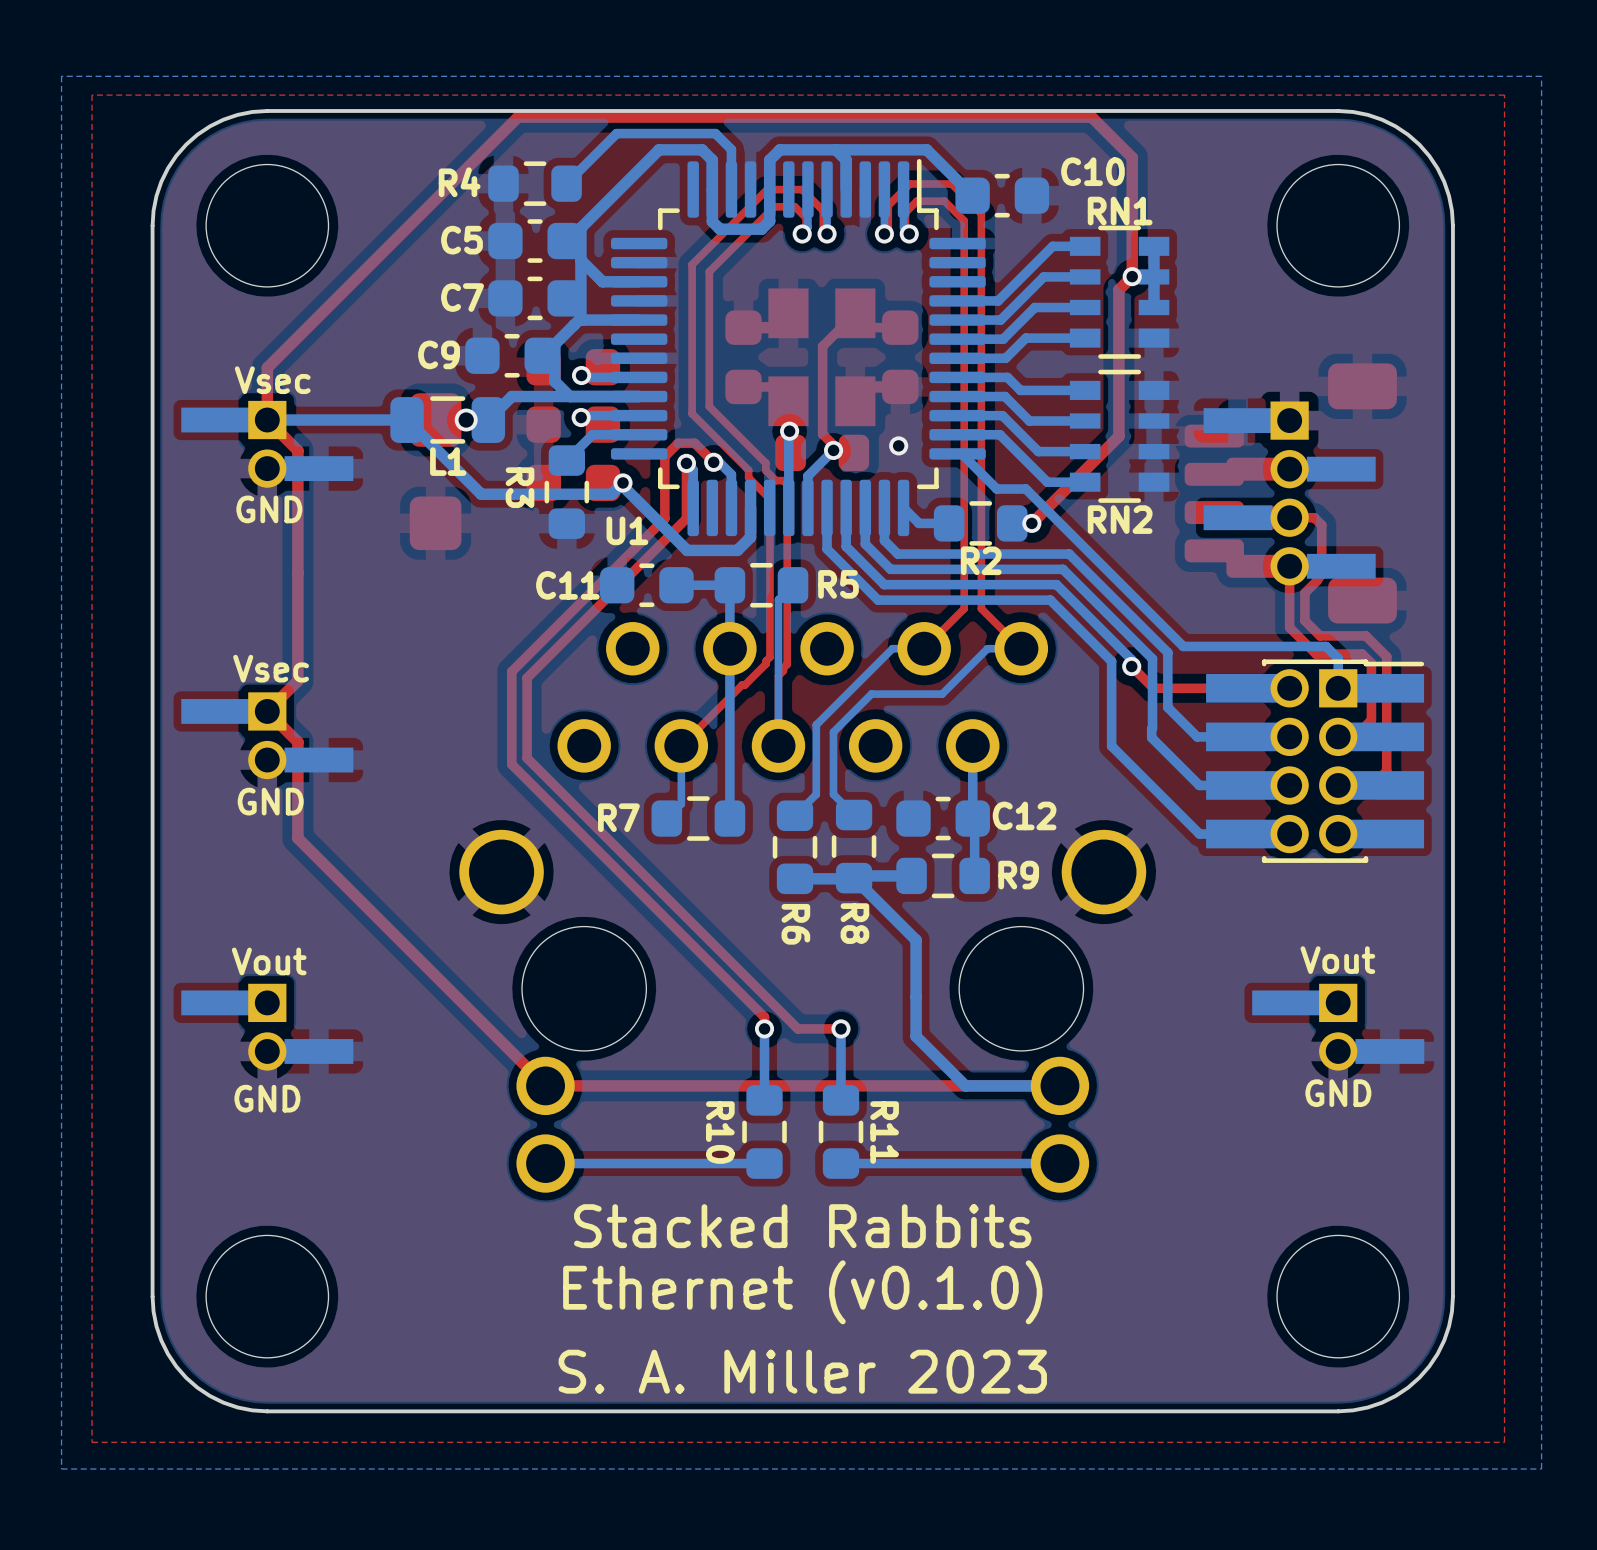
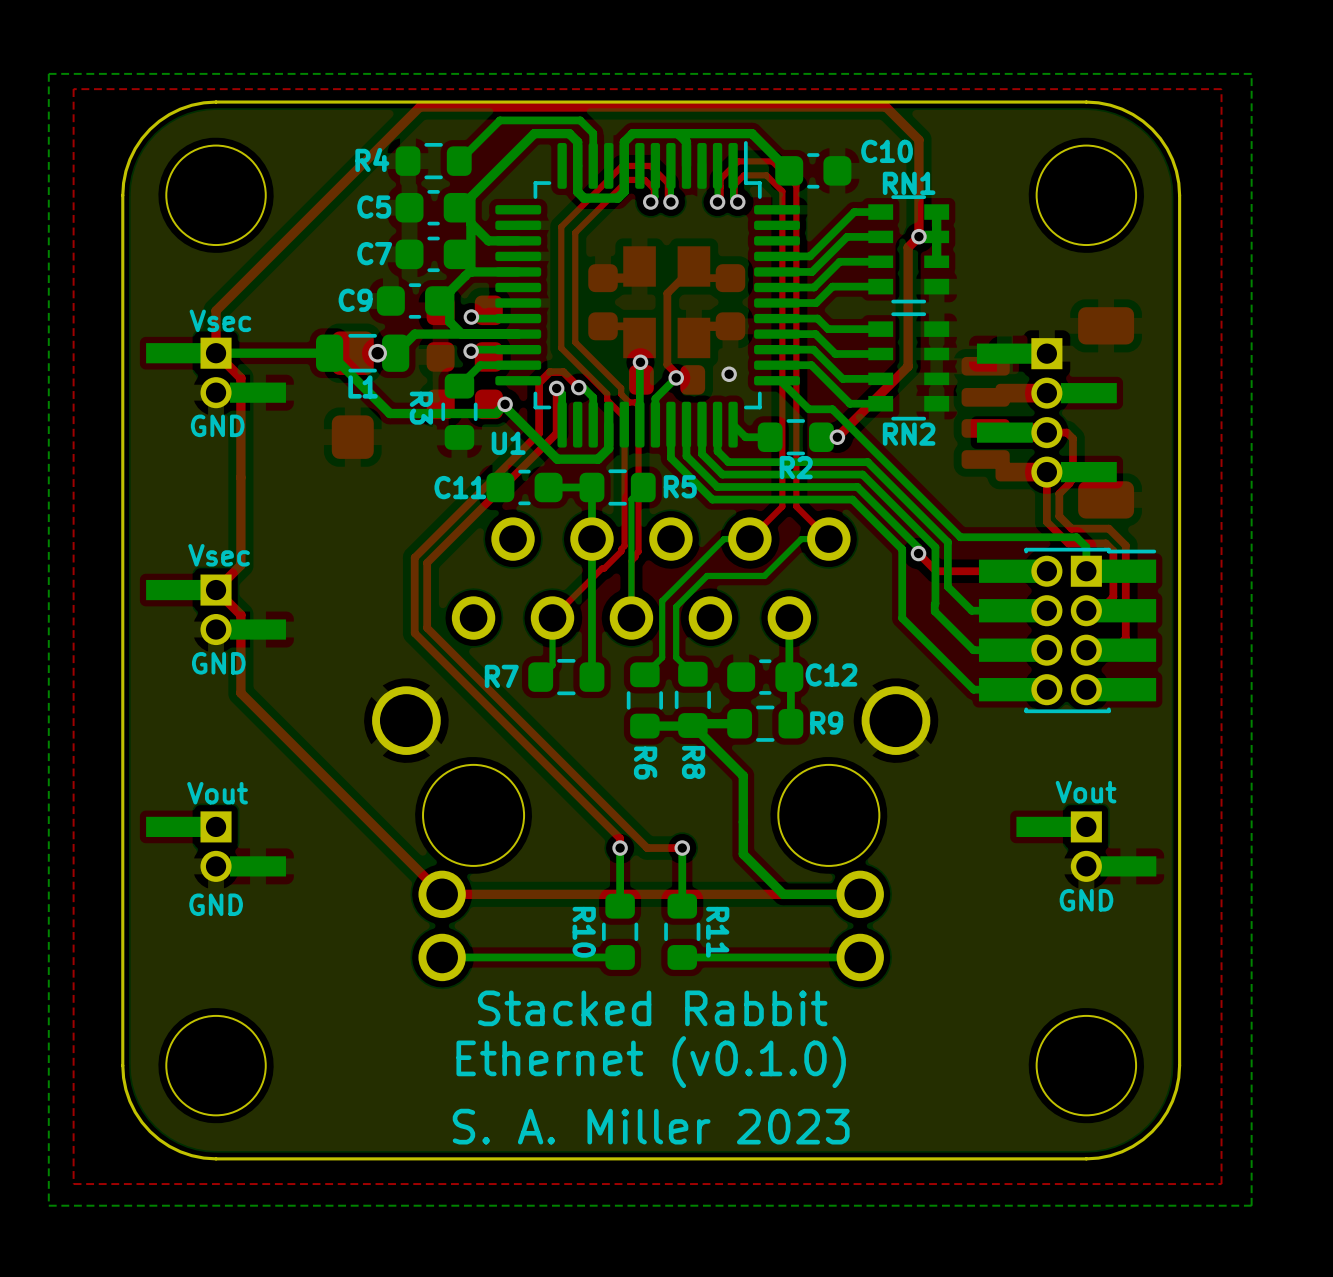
text: Stacked Rabbits (802, 1226) -> Stacked Rabbit (652, 1008)

